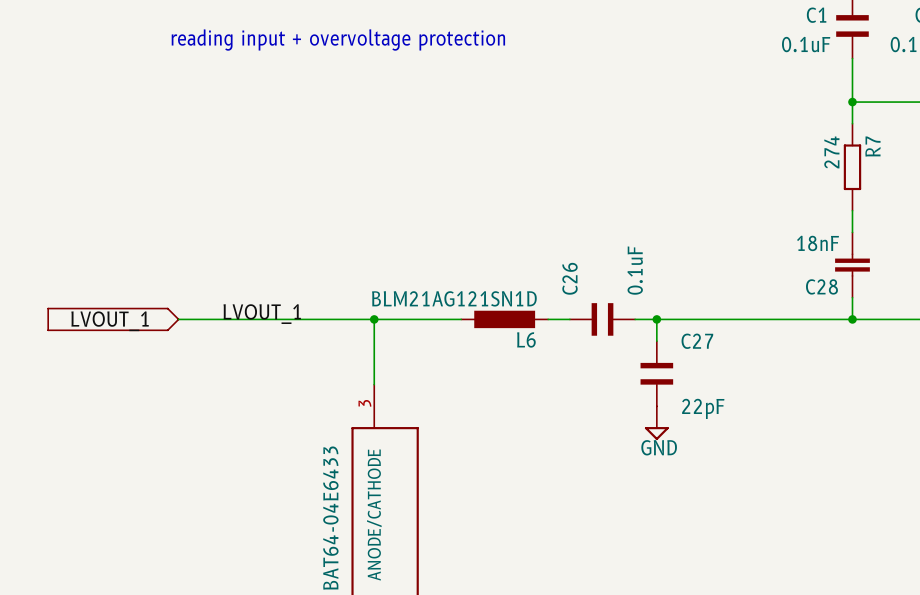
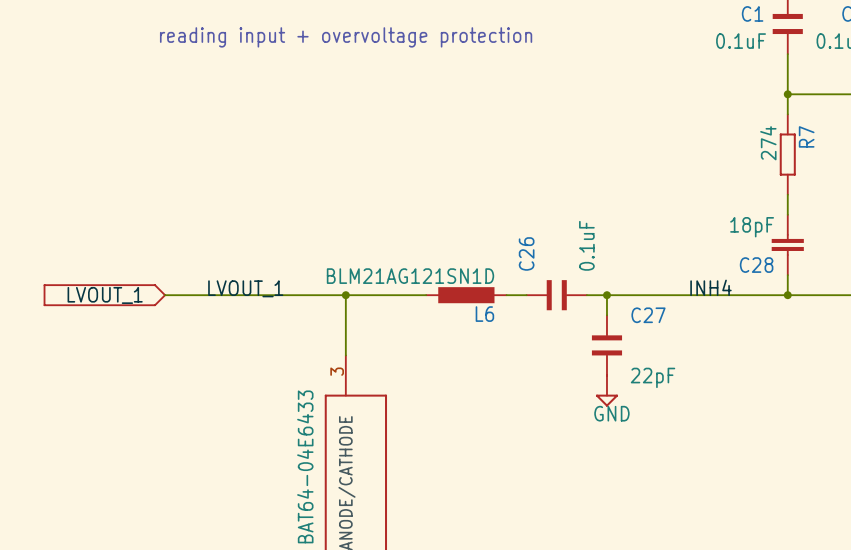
C28 value: 18nF (818, 243) -> 18pF (752, 227)
label: none -> INH4 (710, 287)

